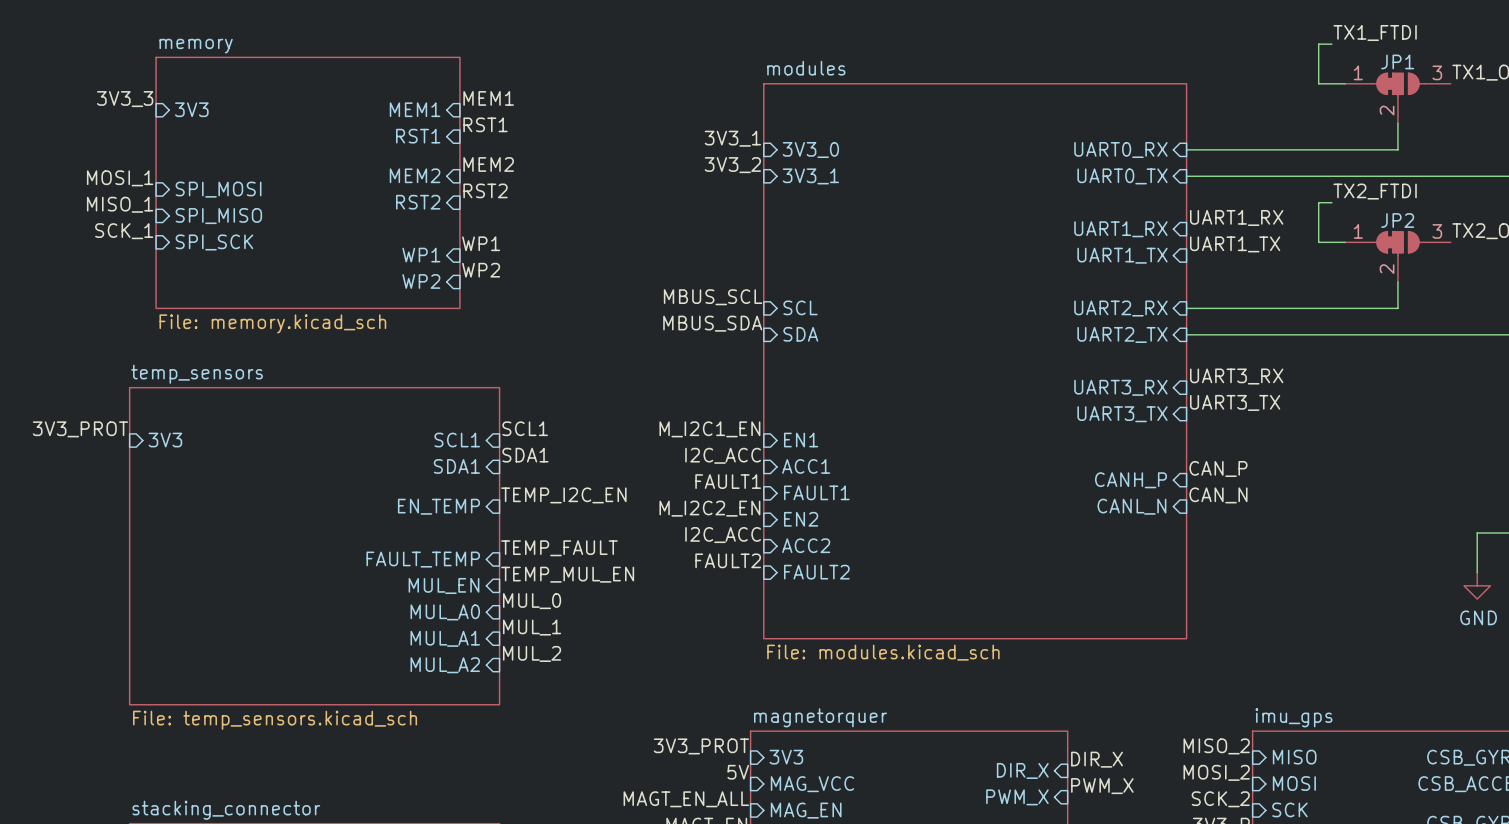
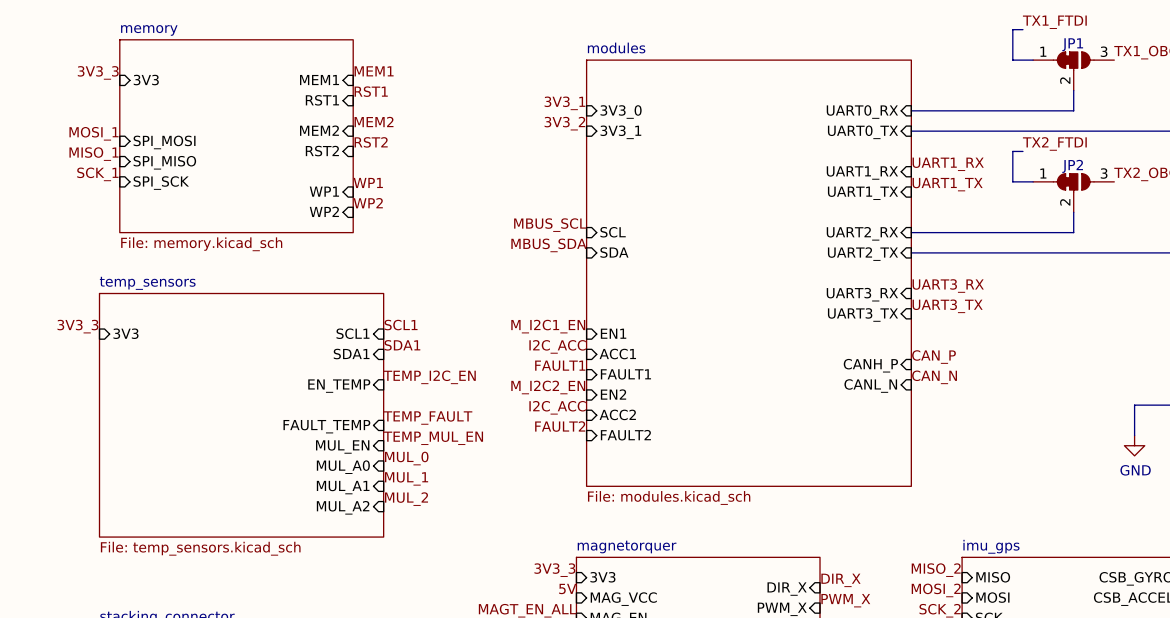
label: 3V3_PROT (80, 429) -> 3V3_3 (77, 326)
label: 3V3_PROT (701, 746) -> 3V3_3 (554, 570)

